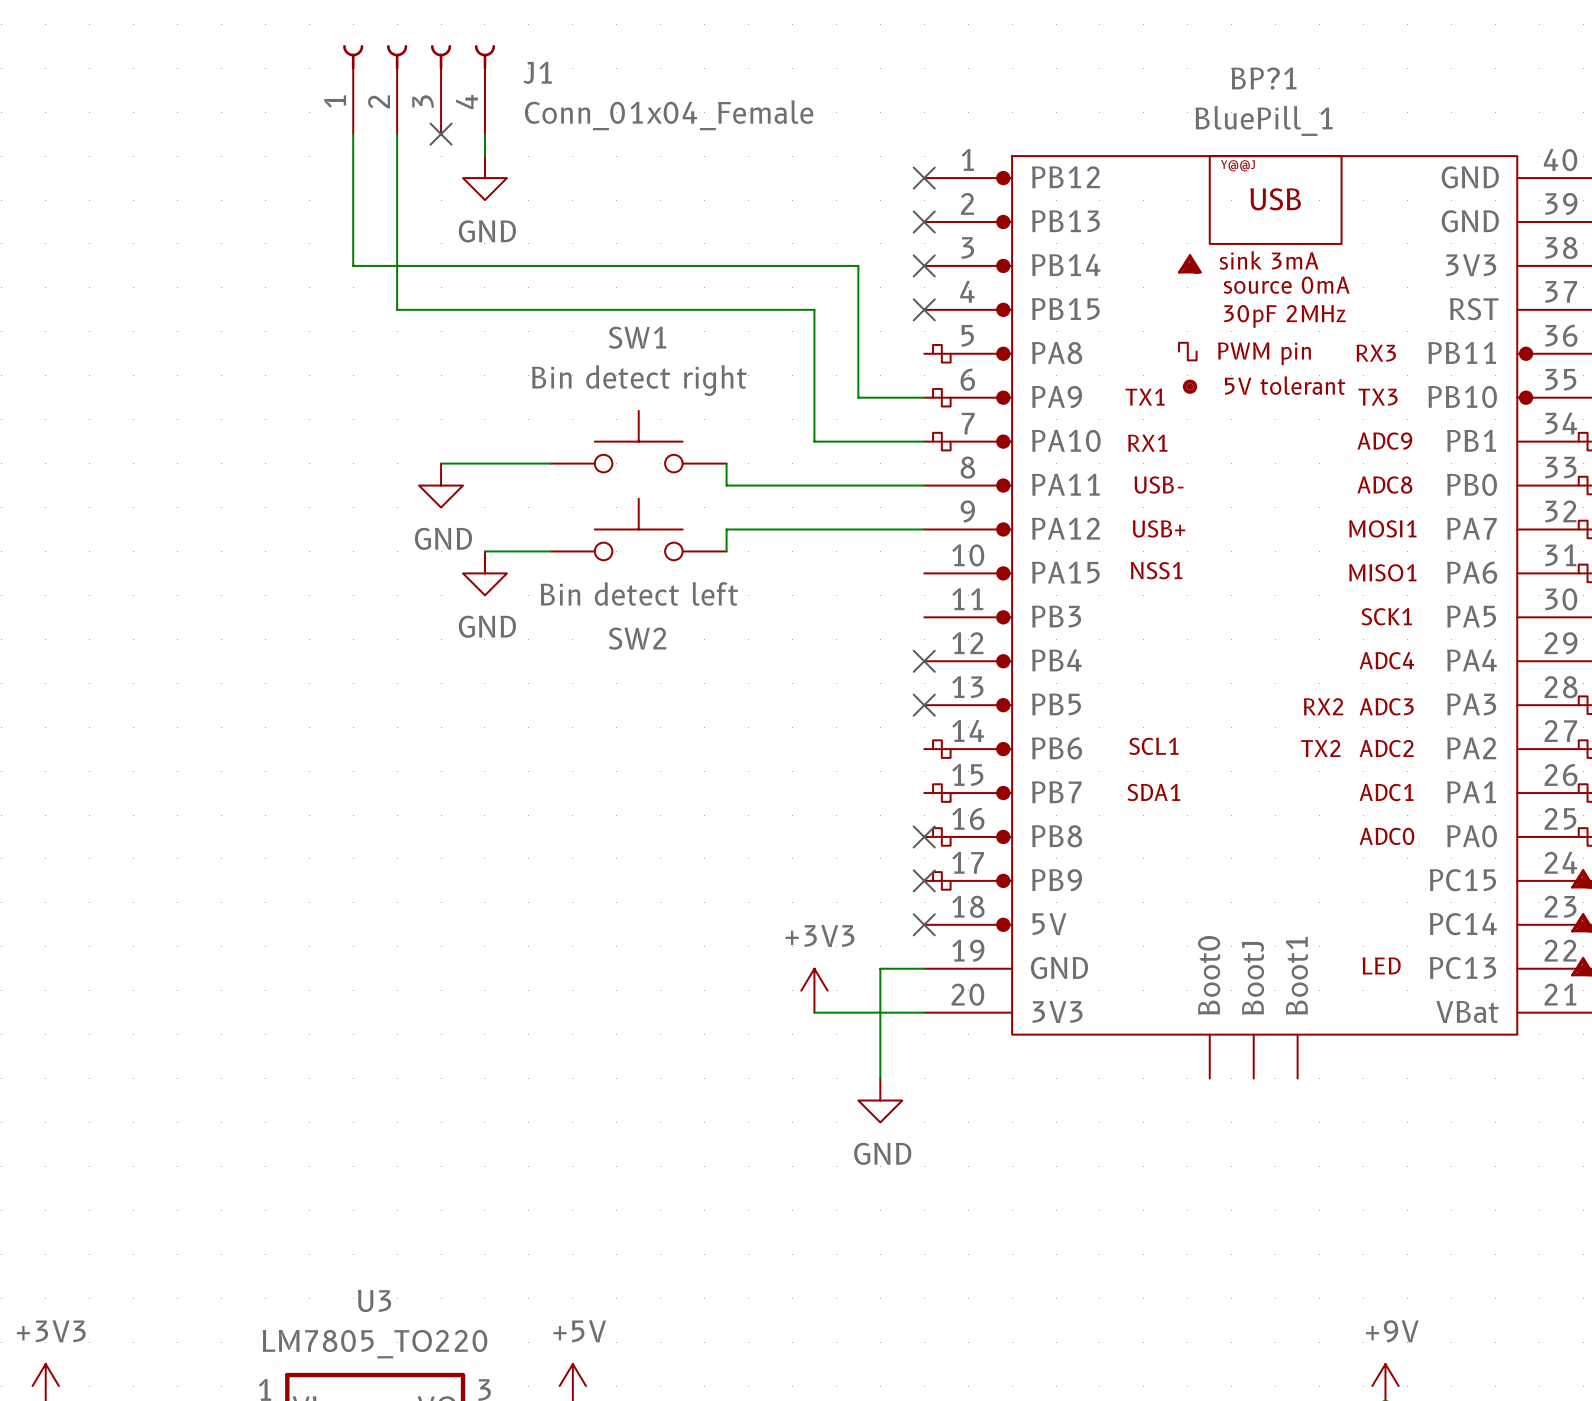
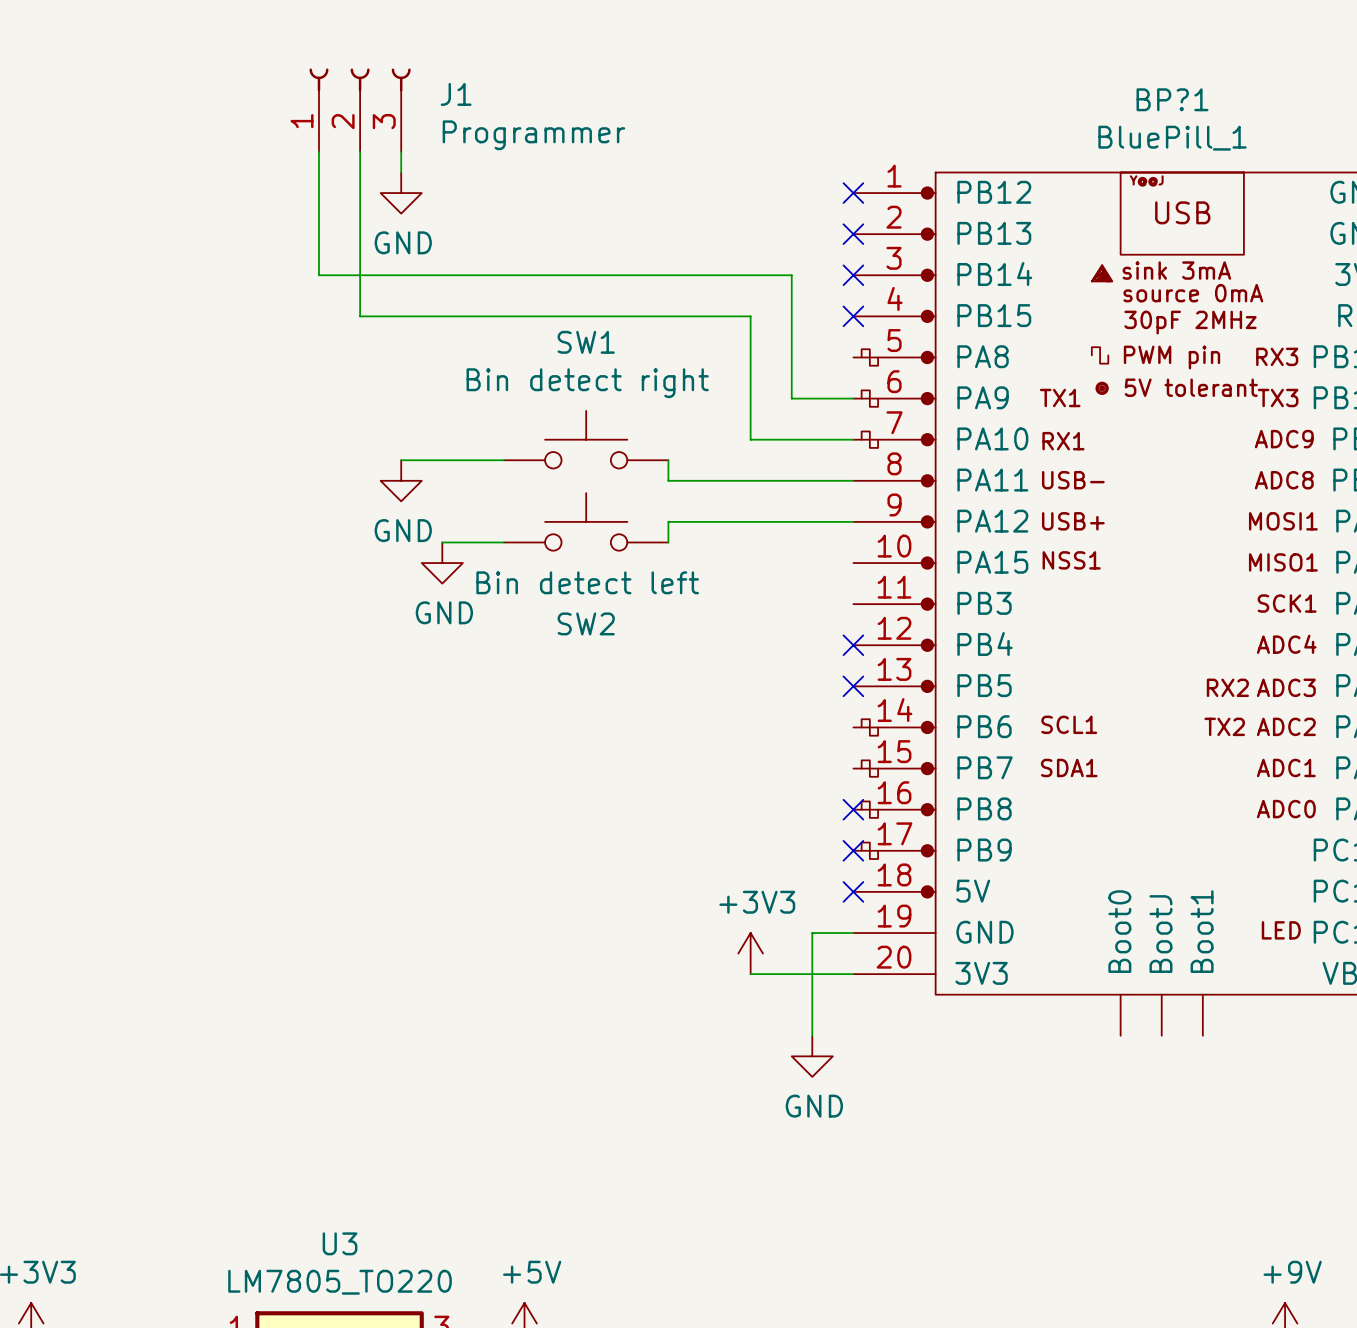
J1 symbol: [343, 44, 496, 135] -> [309, 68, 411, 152]
J1 value: Conn_01x04_Female (669, 115) -> Programmer (533, 135)
no-connect mark: (441, 134) -> none
wire: (484, 134) (484, 156) -> (401, 151) (401, 172)
power symbol position: GND (484, 178) -> GND (401, 193)

